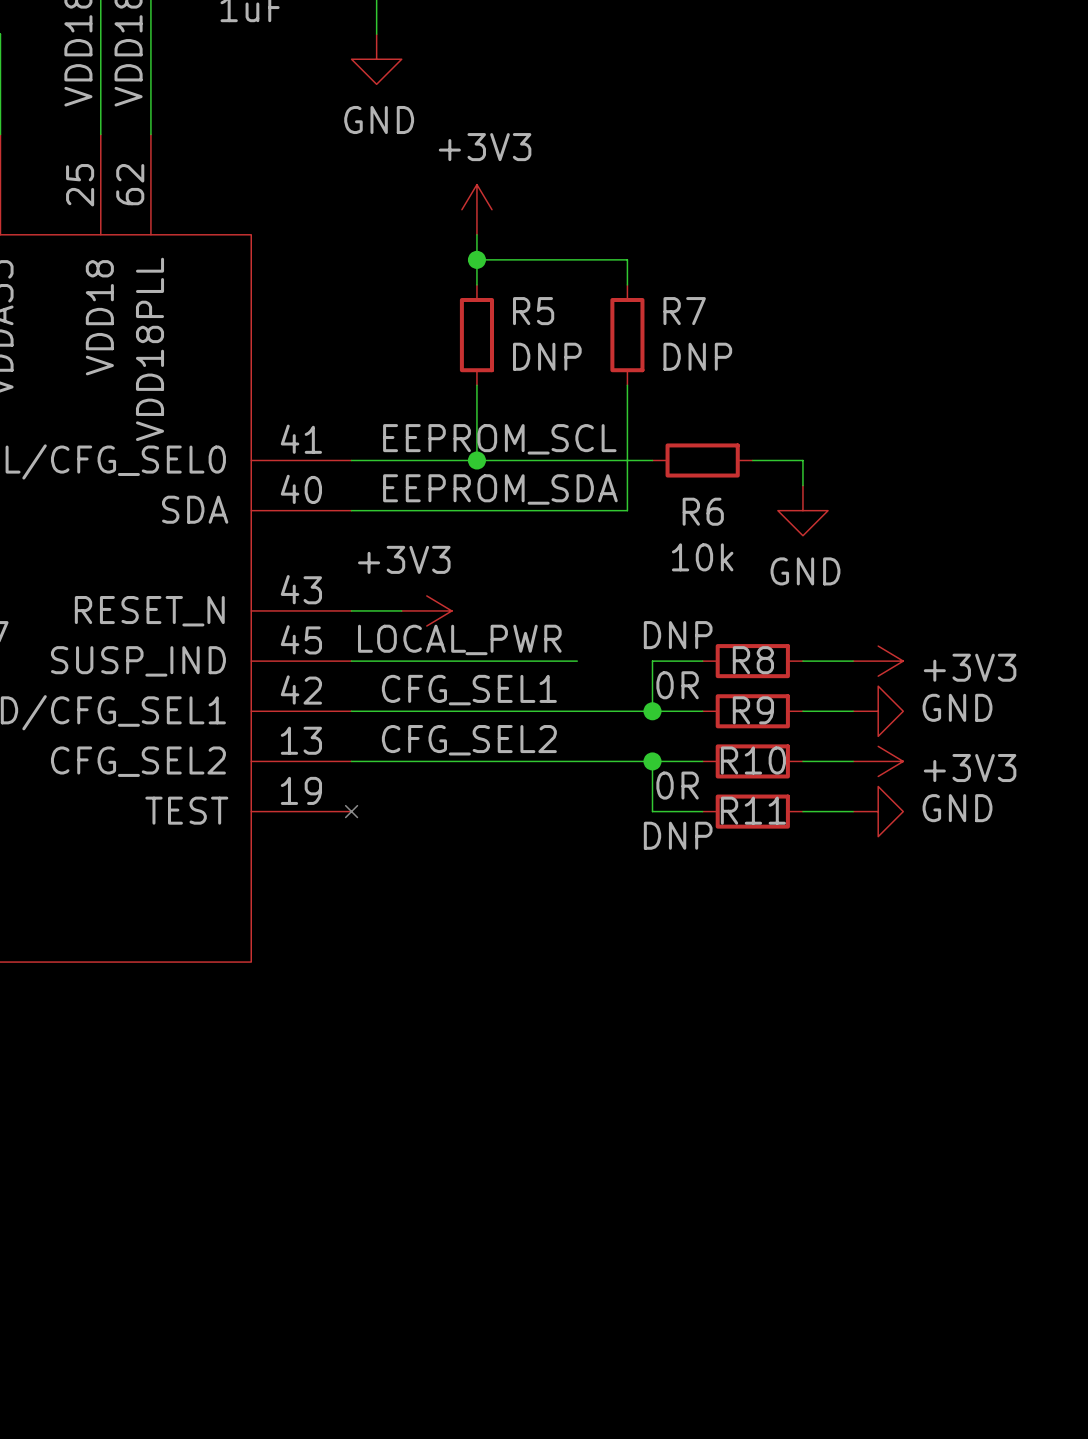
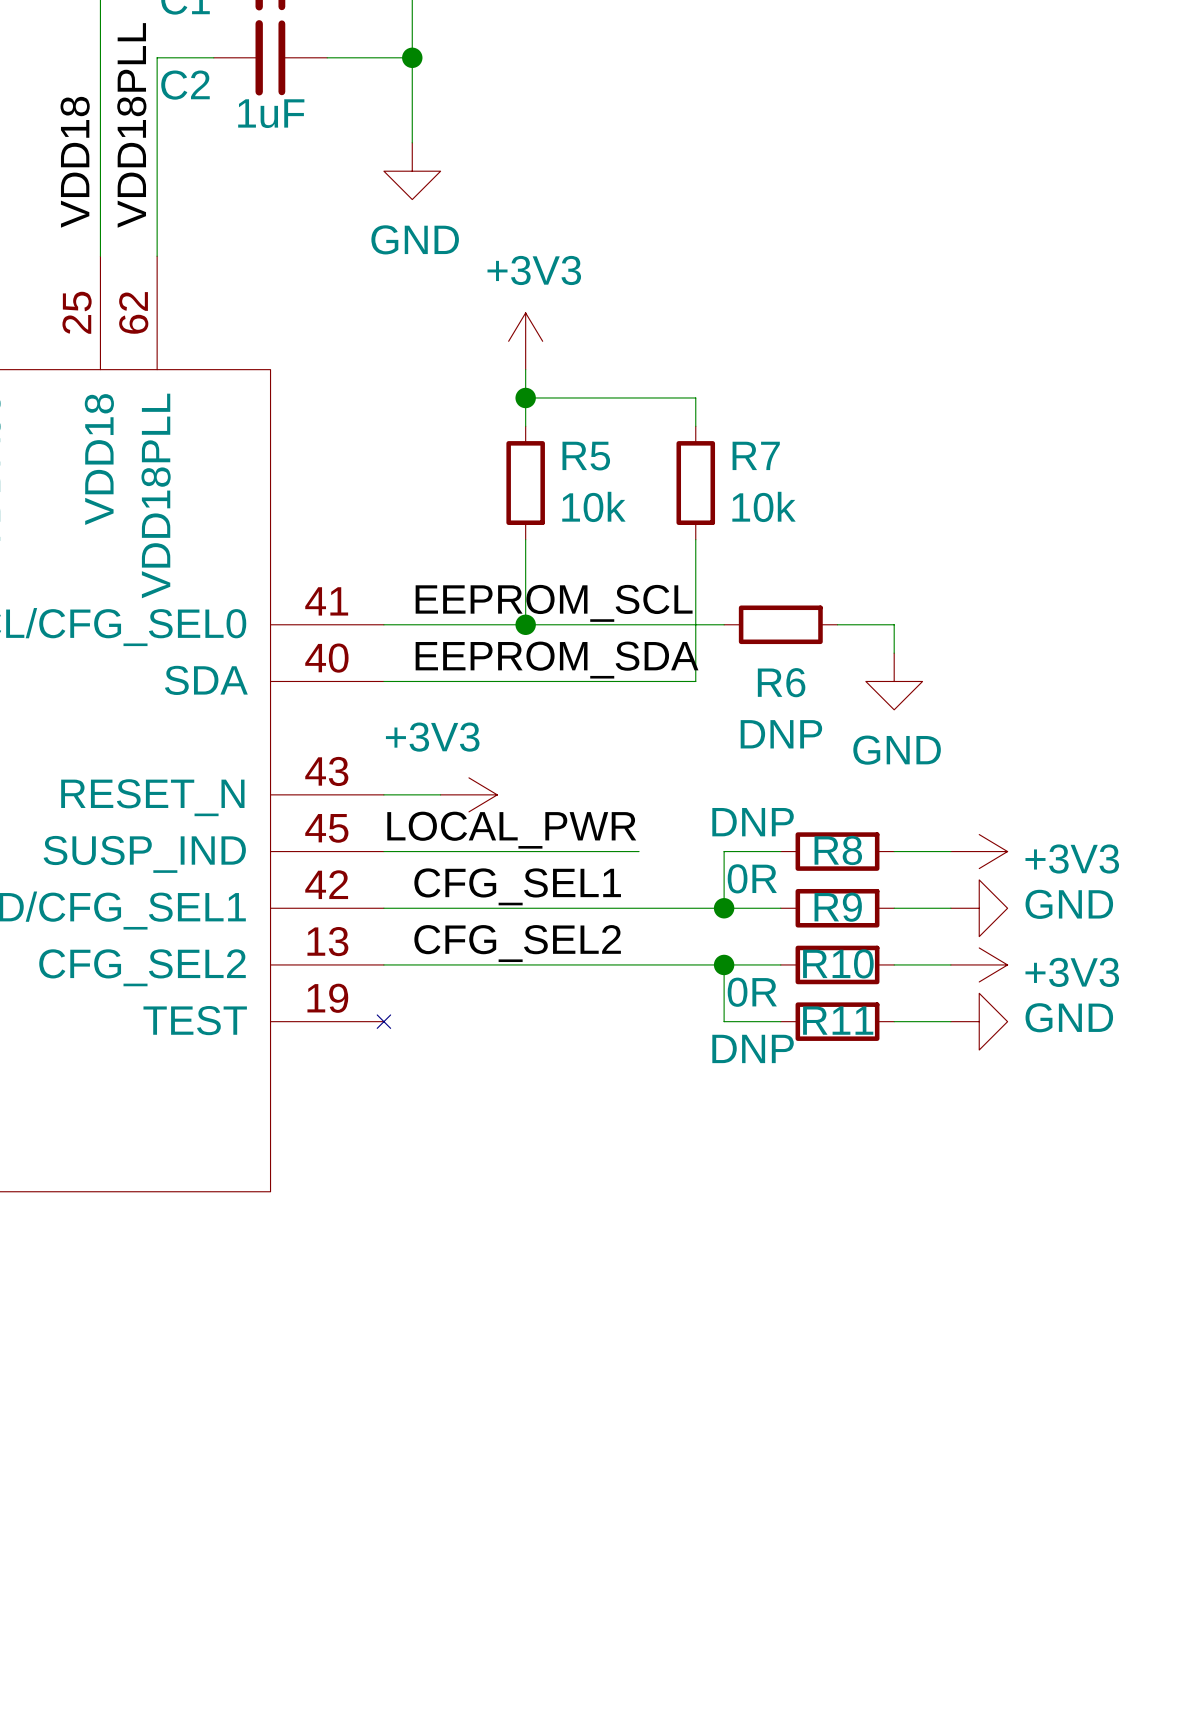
R5 value: DNP (547, 356) -> 10k (593, 506)
R7 value: DNP (697, 356) -> 10k (764, 506)
R6 value: 10k (702, 557) -> DNP (781, 734)

